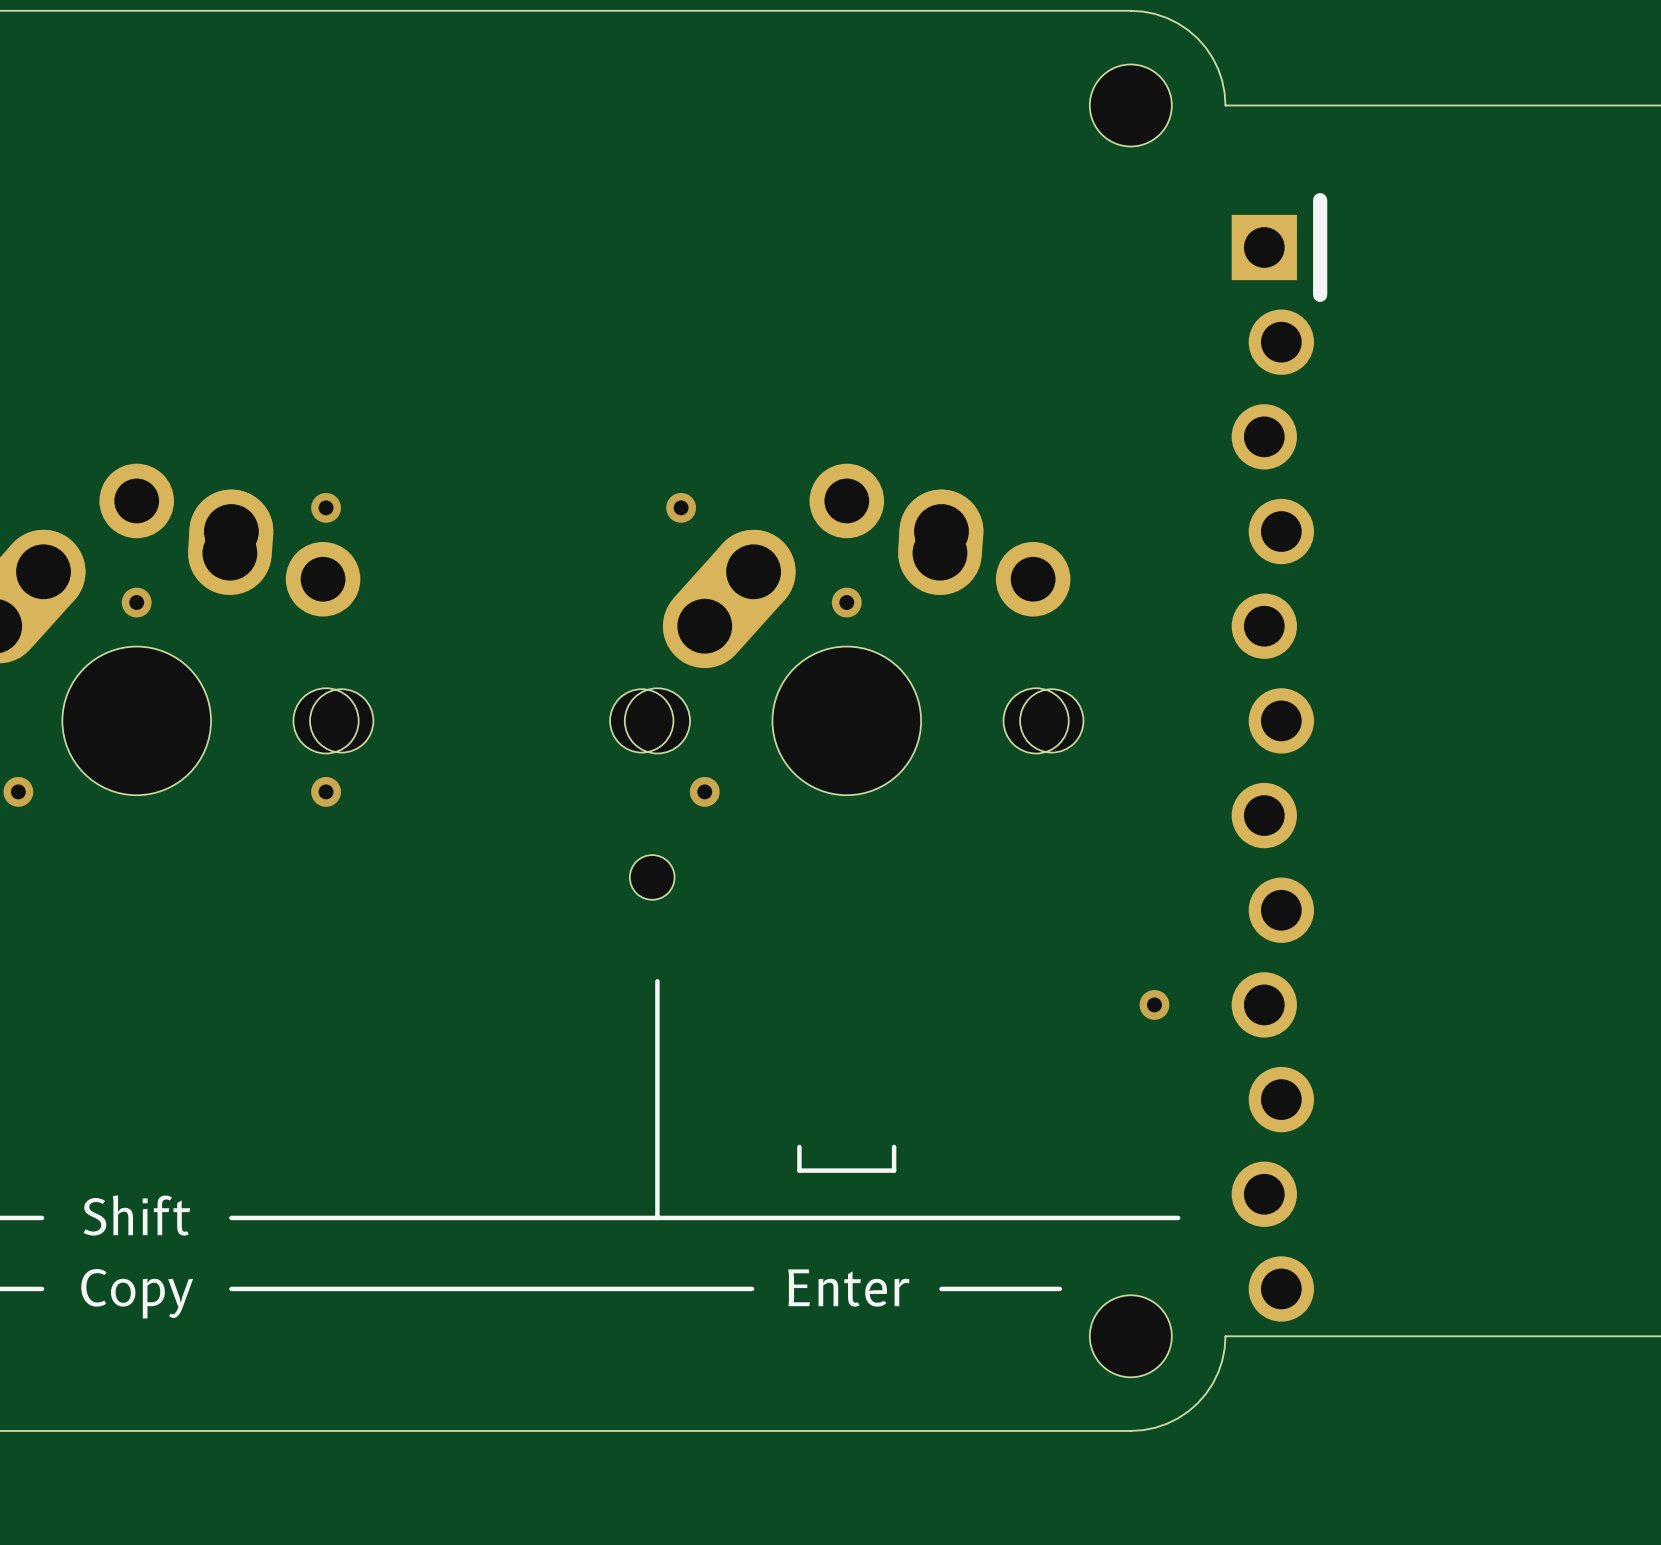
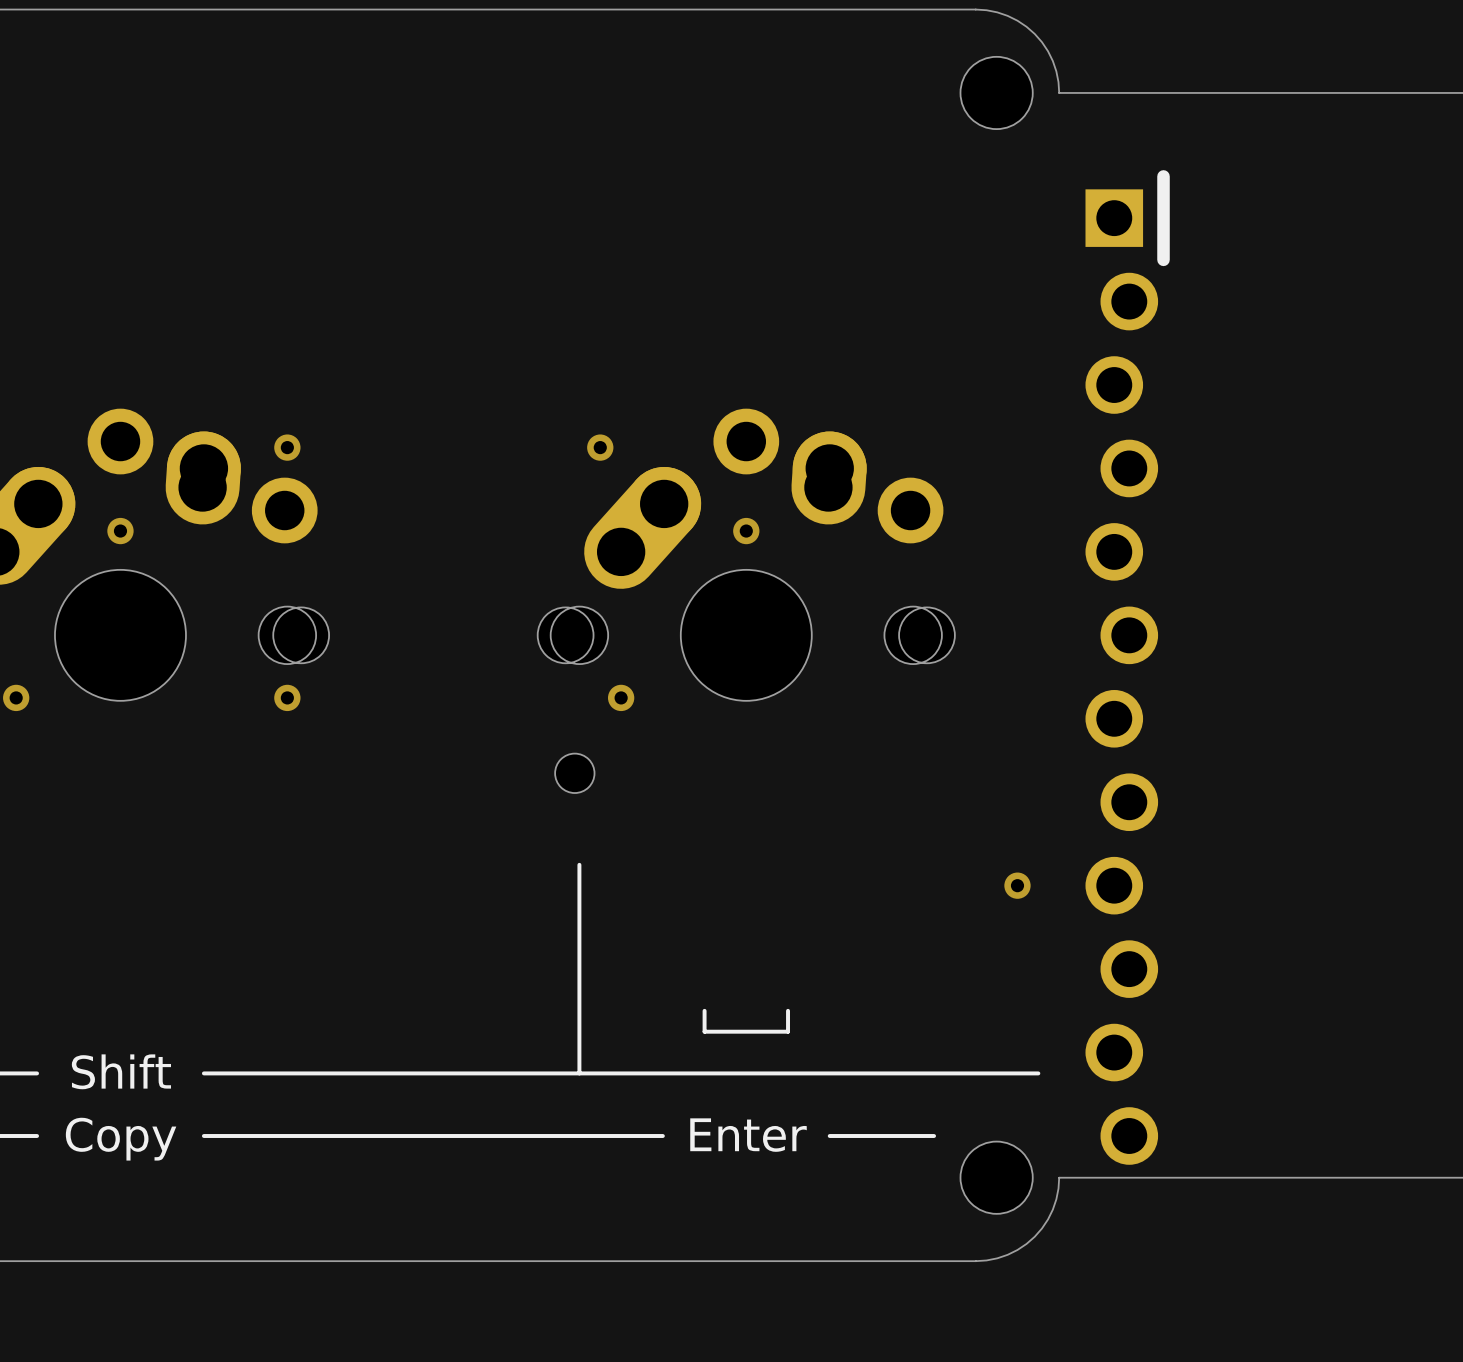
board edge: (1107, 10) (1143, 11) (1155, 14) (1178, 23) (1188, 30) (1205, 47) (1218, 69) (1222, 80) (1225, 105) -> (975, 9) (997, 12) (1026, 26) (1048, 51) (1056, 71) (1059, 92) (1080, 92)
board edge: (1225, 1336) (1222, 1360) (1212, 1383) (1197, 1403) (1188, 1411) (1178, 1418) (1155, 1427) (1143, 1430) (1107, 1430) -> (1080, 1177) (1059, 1177) (1056, 1199) (1048, 1219) (1026, 1243) (997, 1258) (975, 1261)

